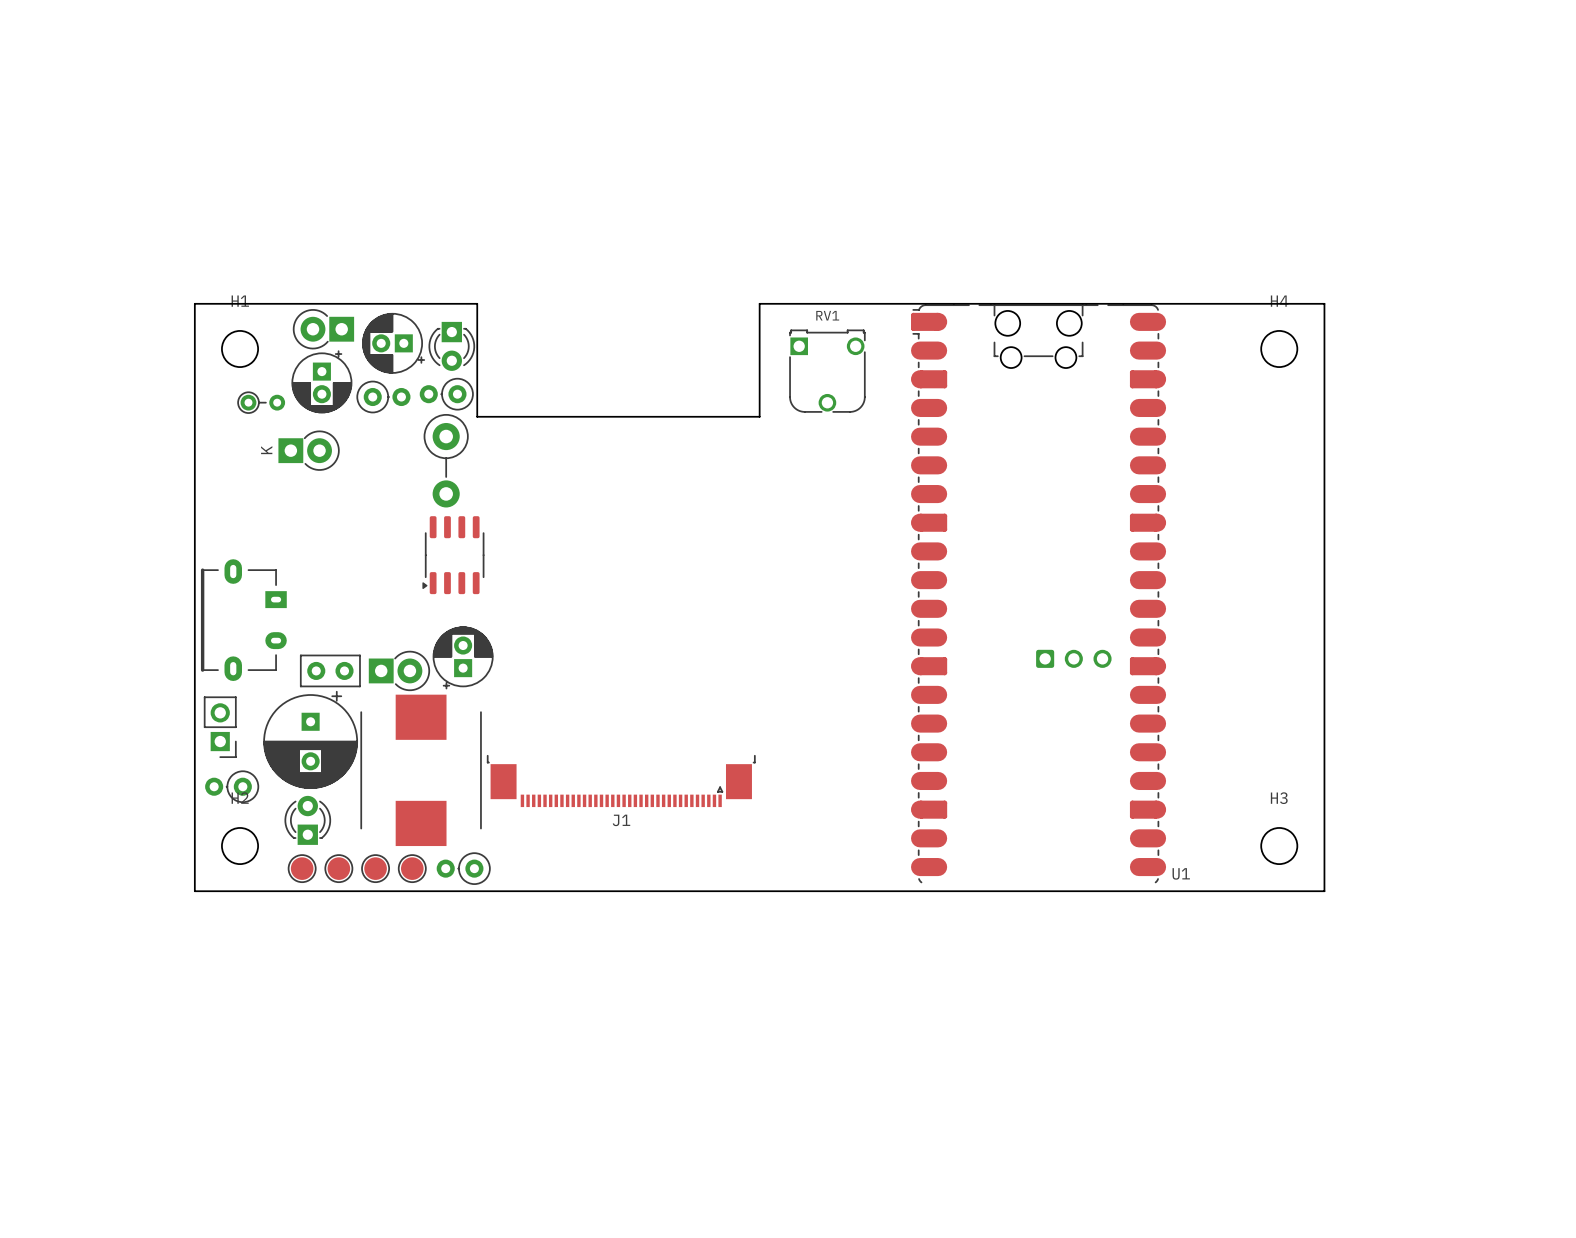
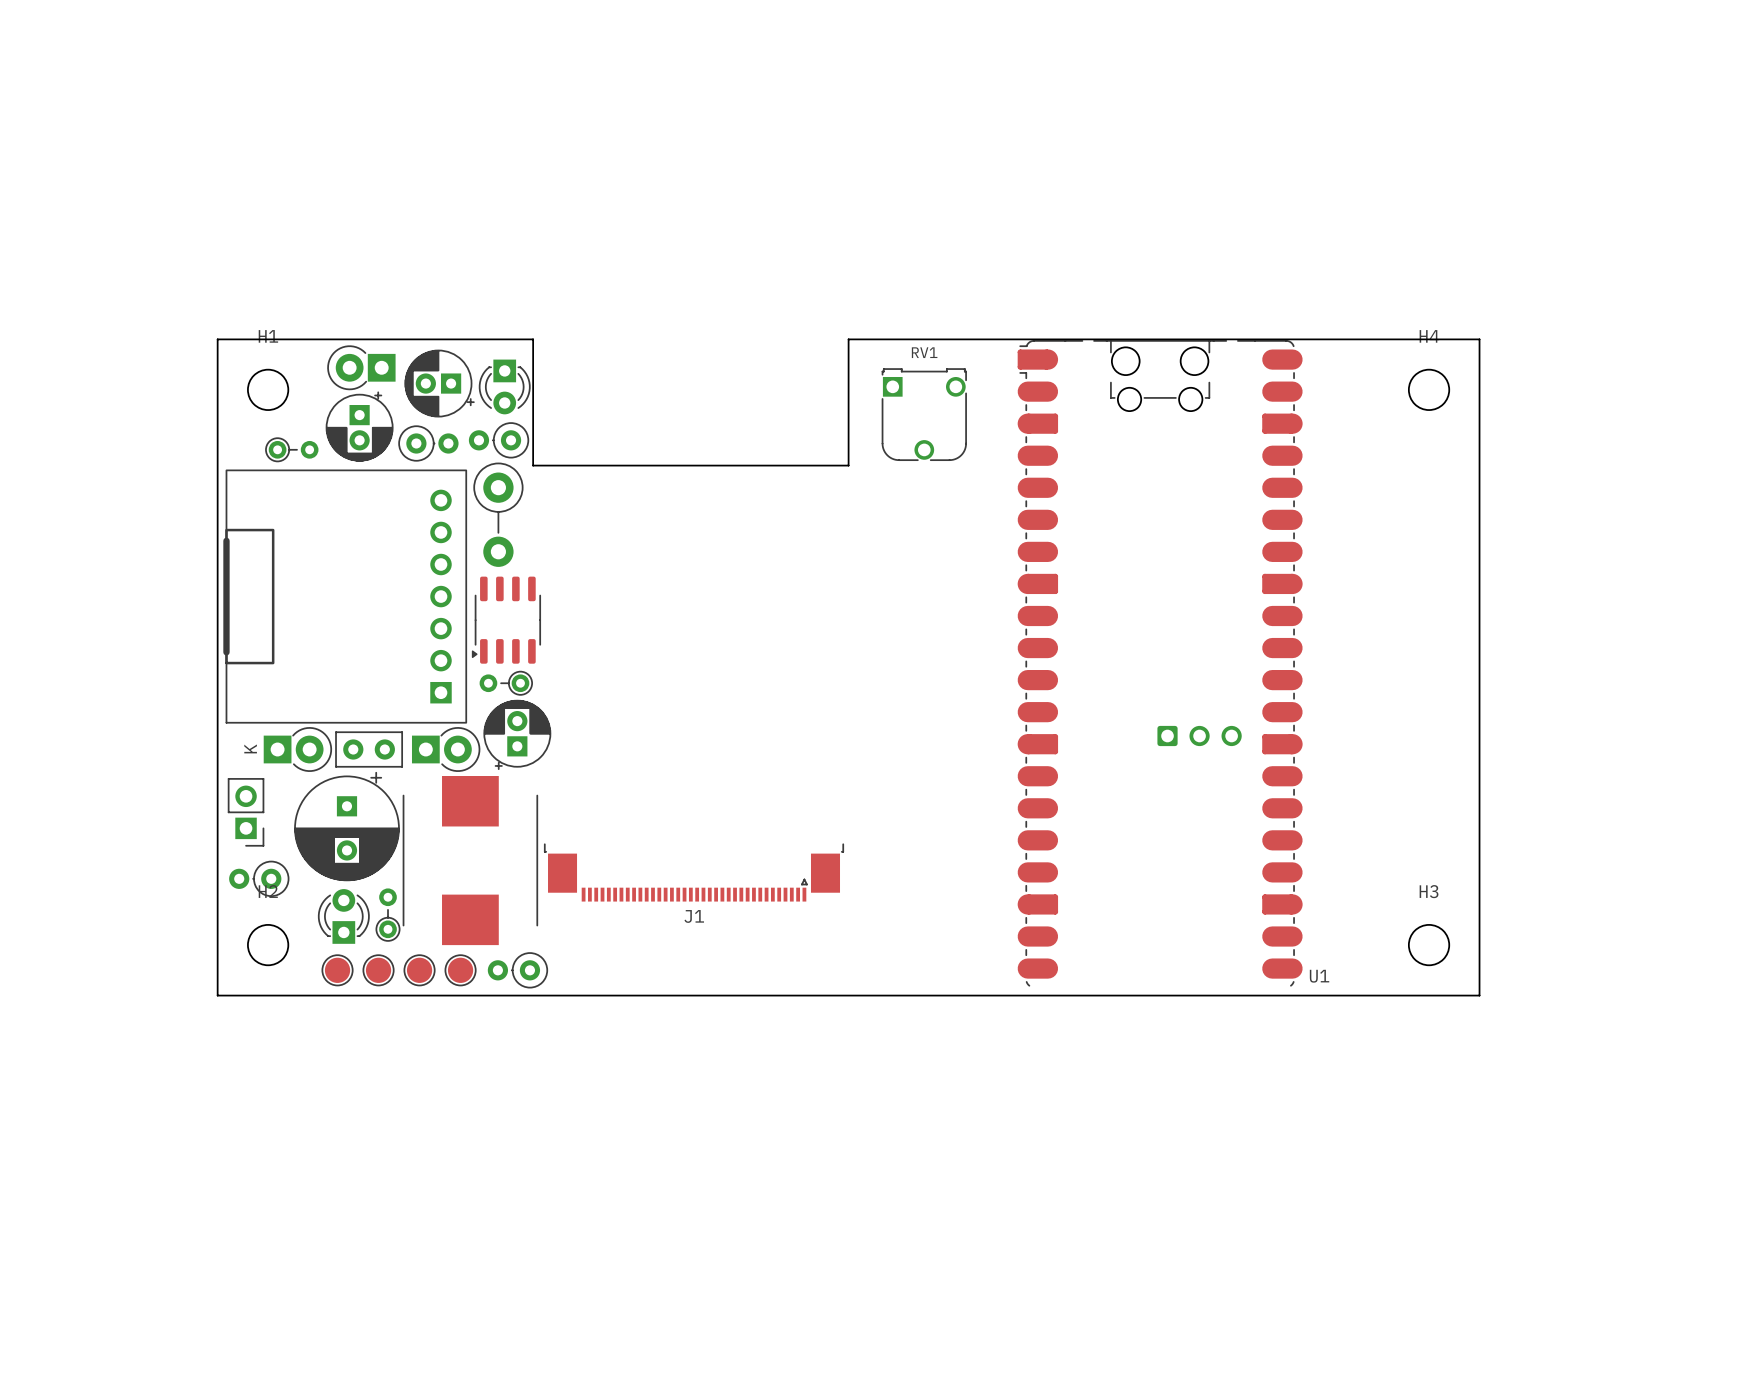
part position: (308, 450) -> (297, 749)
part: none -> (345, 596)
part: none -> (506, 683)
part: (243, 620) -> none
part: none -> (388, 915)

